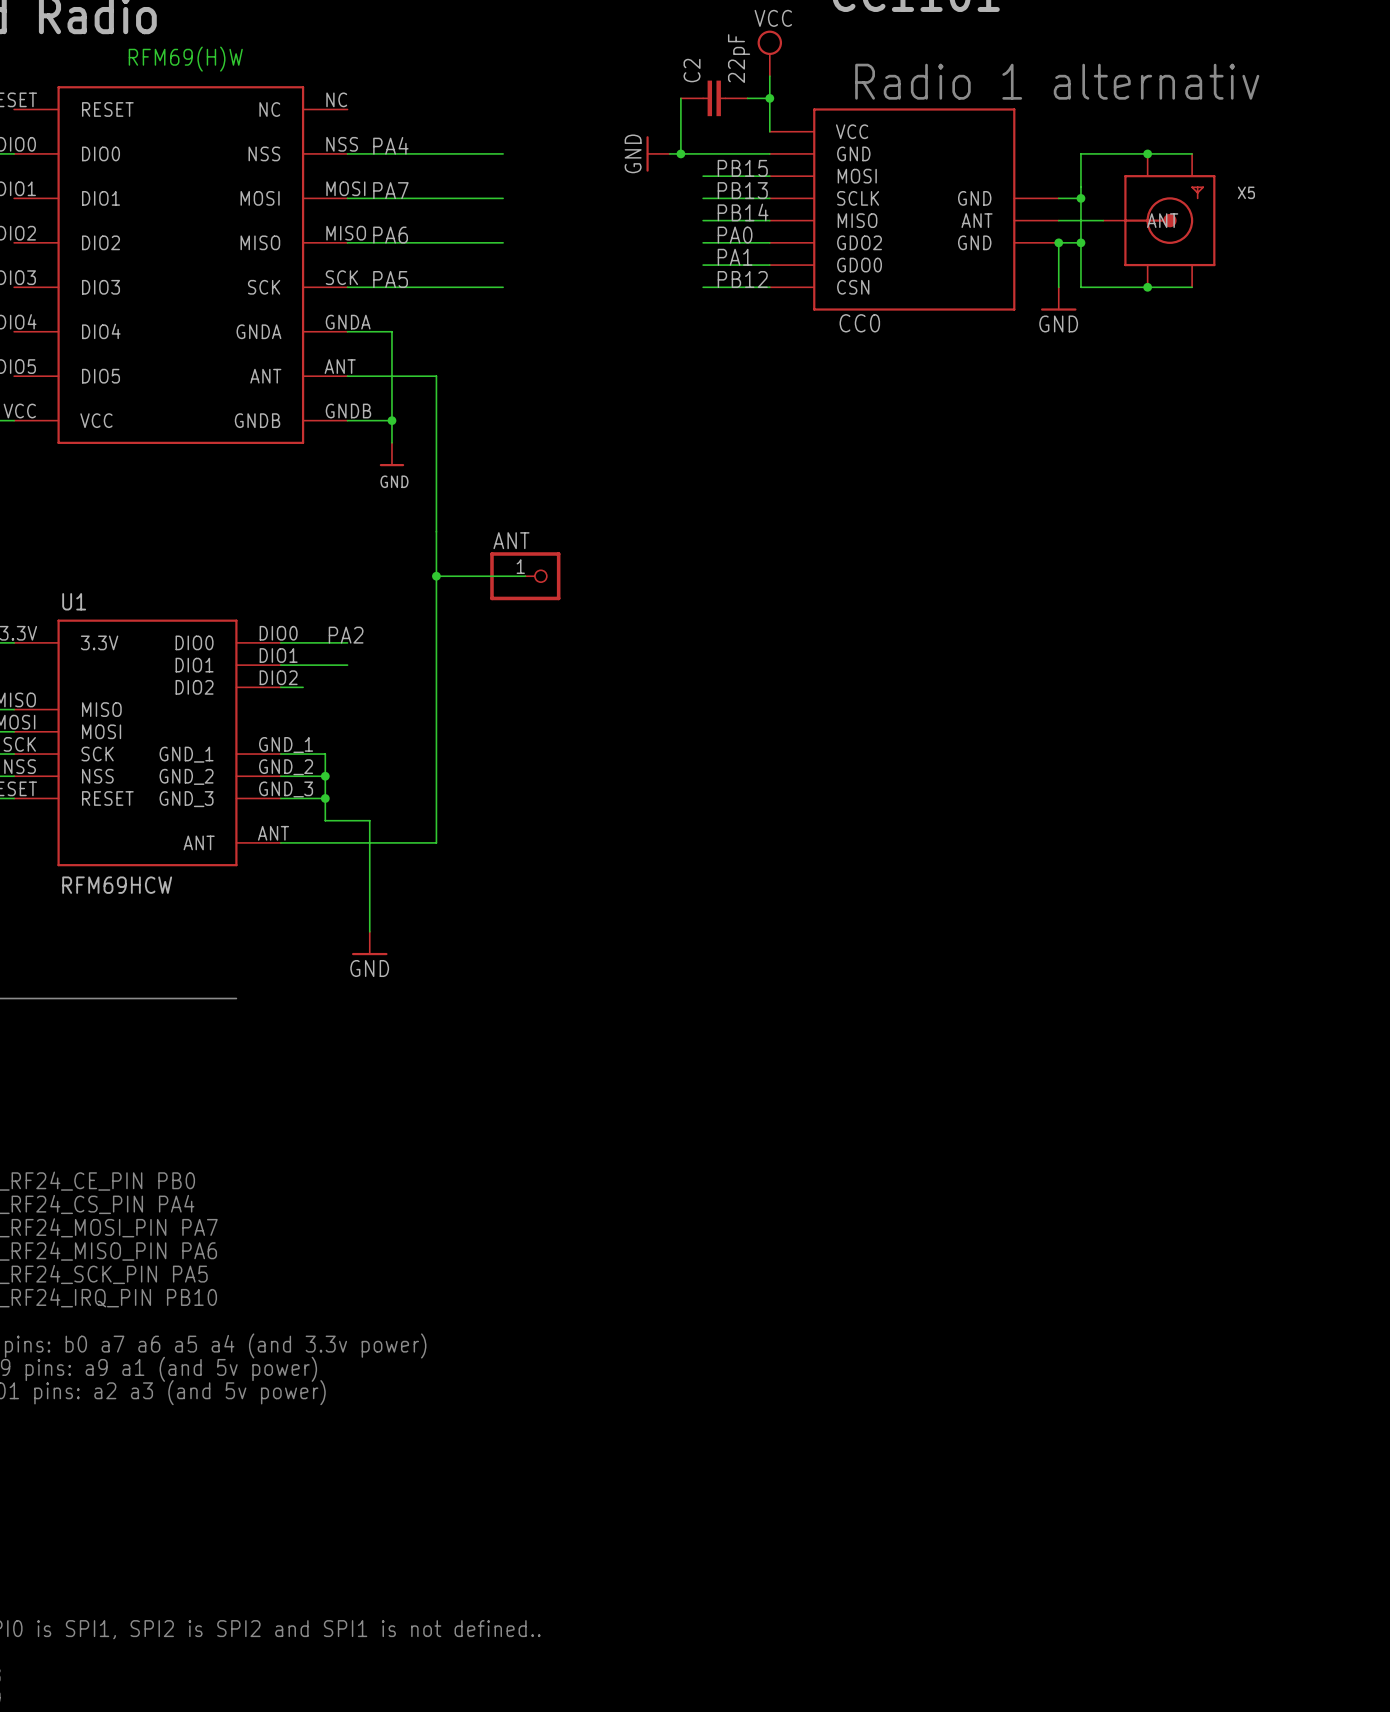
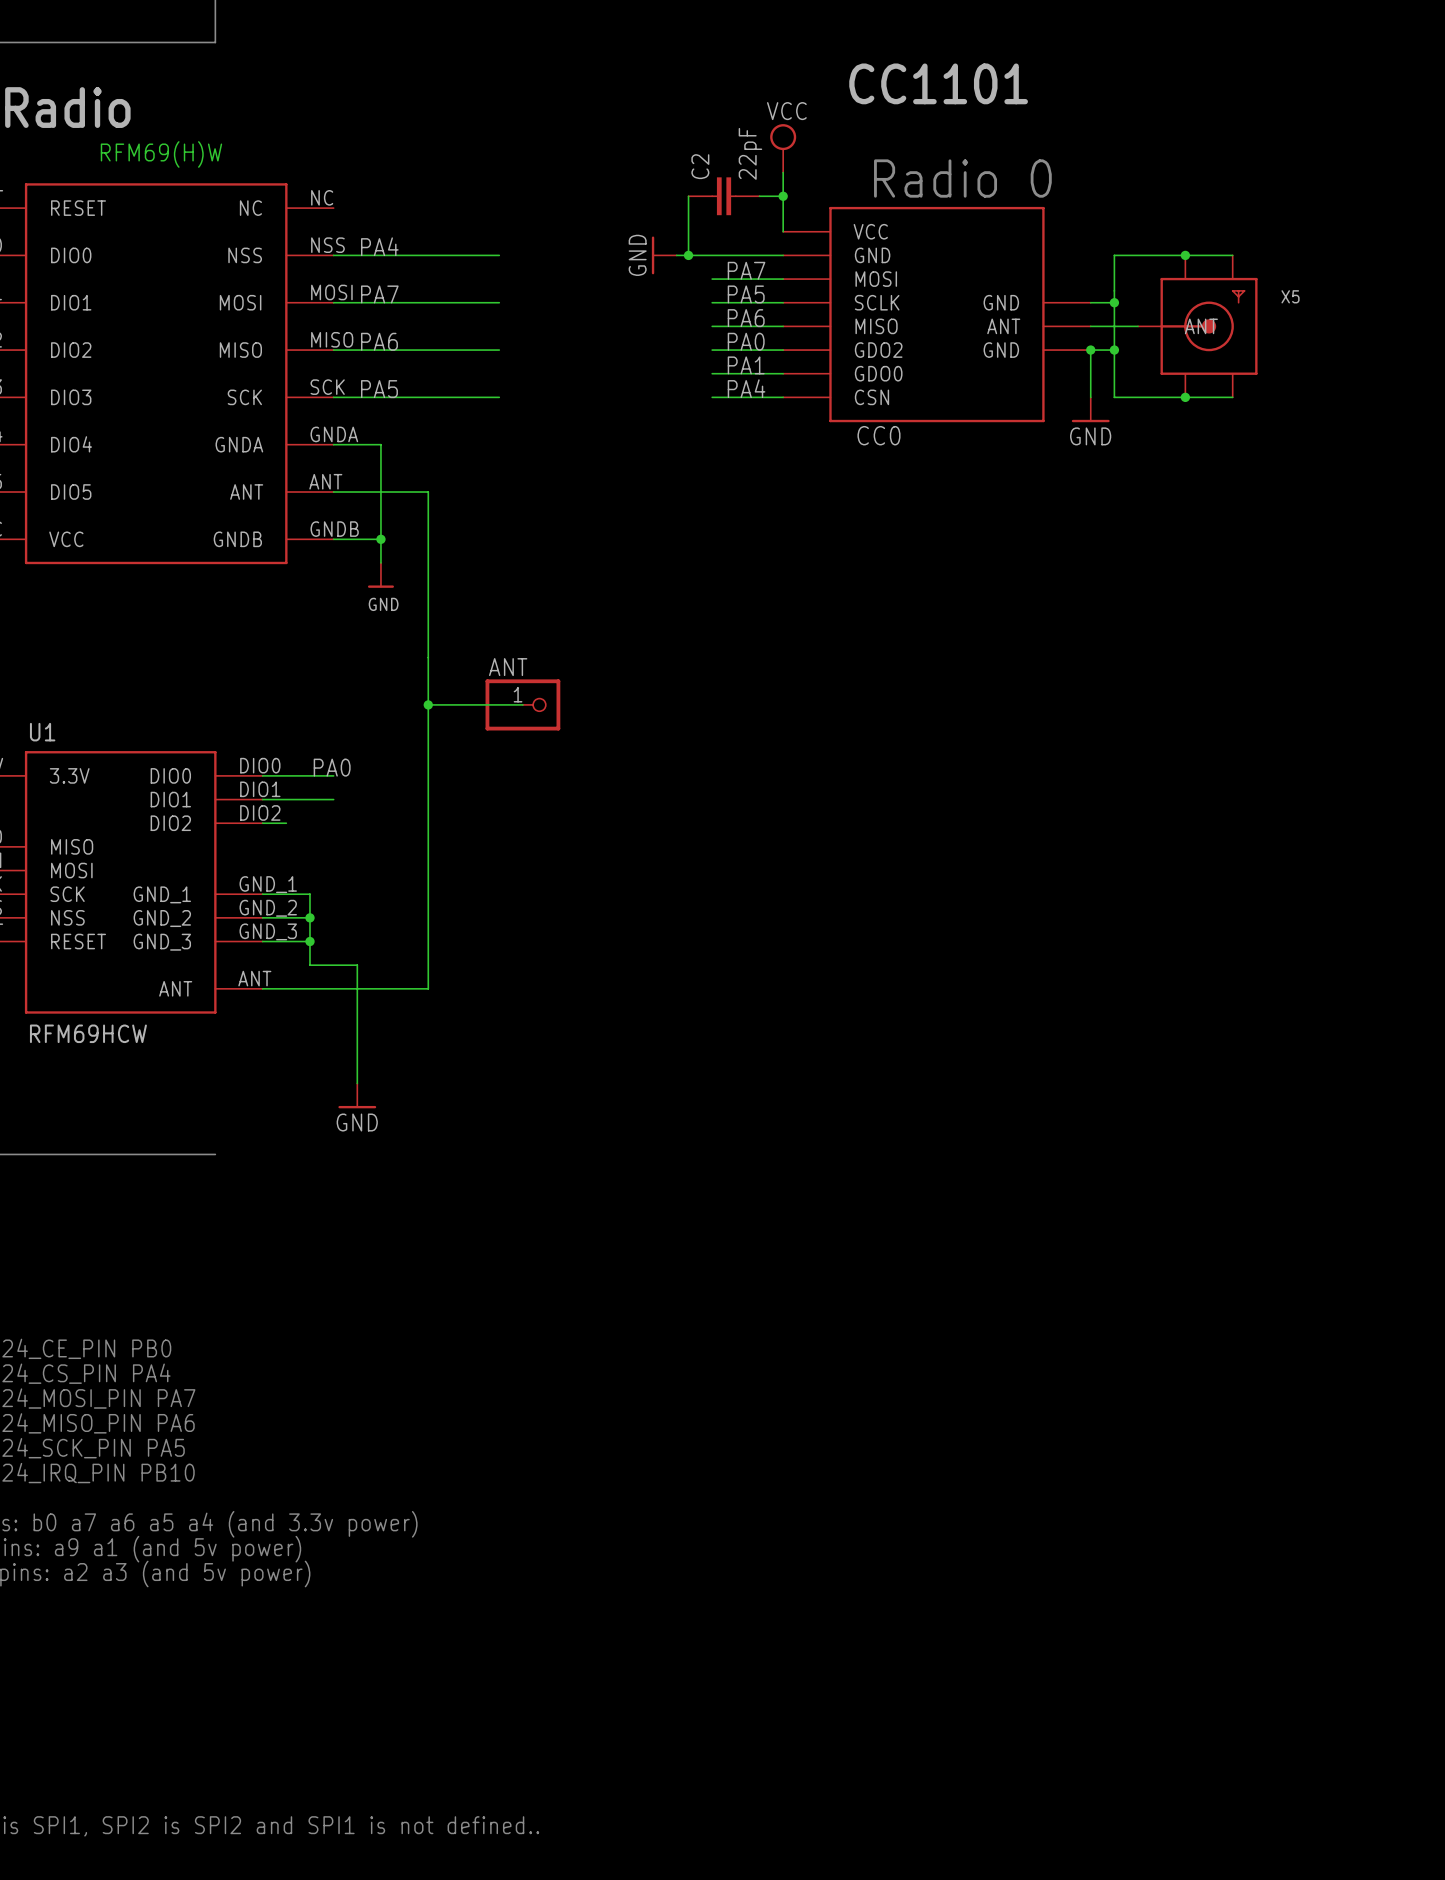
text: Radio 1 alternativ (1057, 81) -> Radio 0 (962, 178)
label: PB15 (742, 168) -> PA7 (746, 270)
label: PB13 (742, 190) -> PA5 (746, 294)
label: PB14 (743, 212) -> PA6 (746, 318)
label: PB12 (742, 279) -> PA4 (746, 388)
label: PA2 (346, 635) -> PA0 (332, 767)

